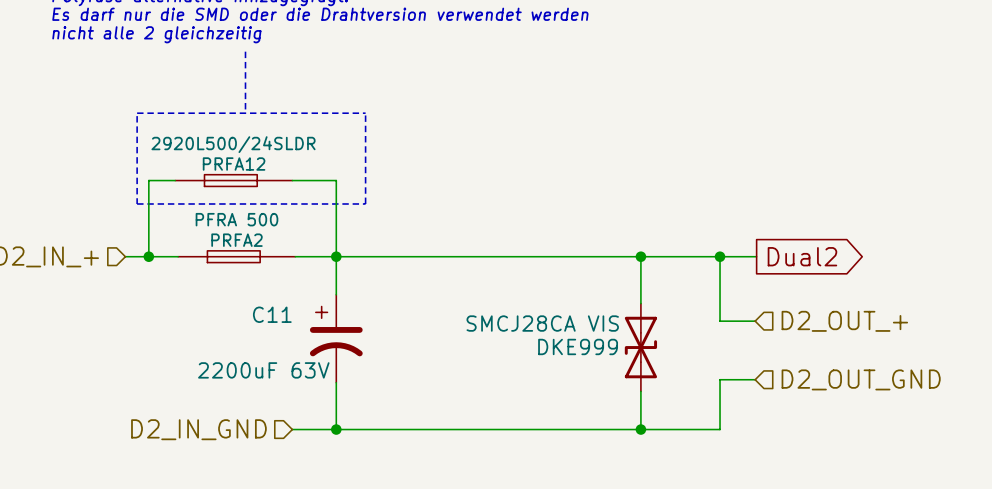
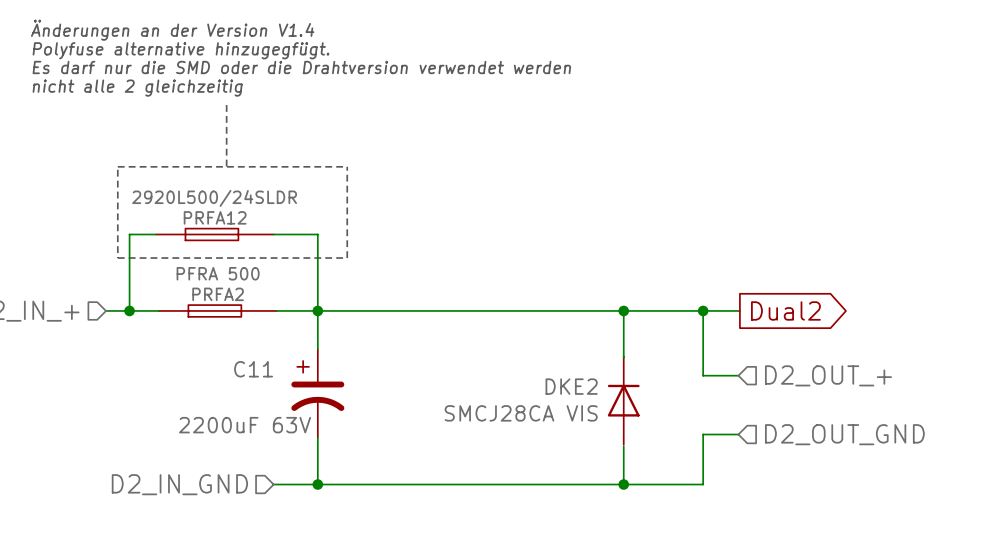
DKE2: none -> SMCJ28CA VIS (623, 400)
DKE999: SMCJ28CA VIS (640, 347) -> none

